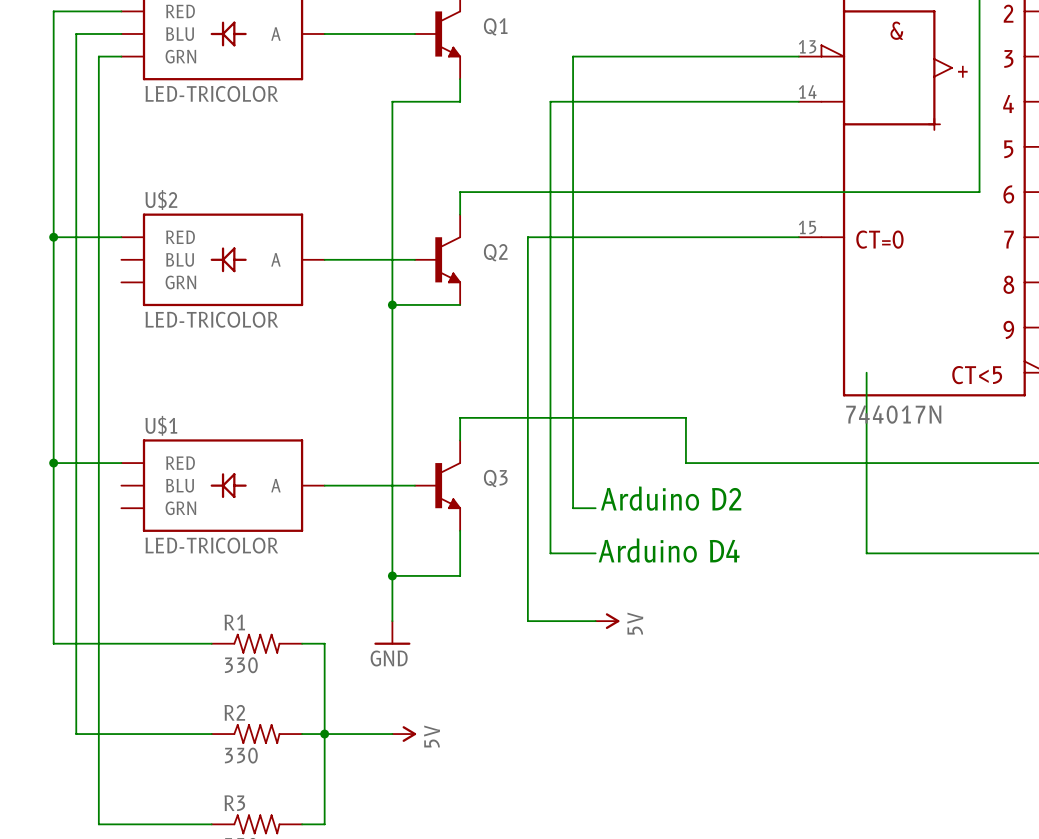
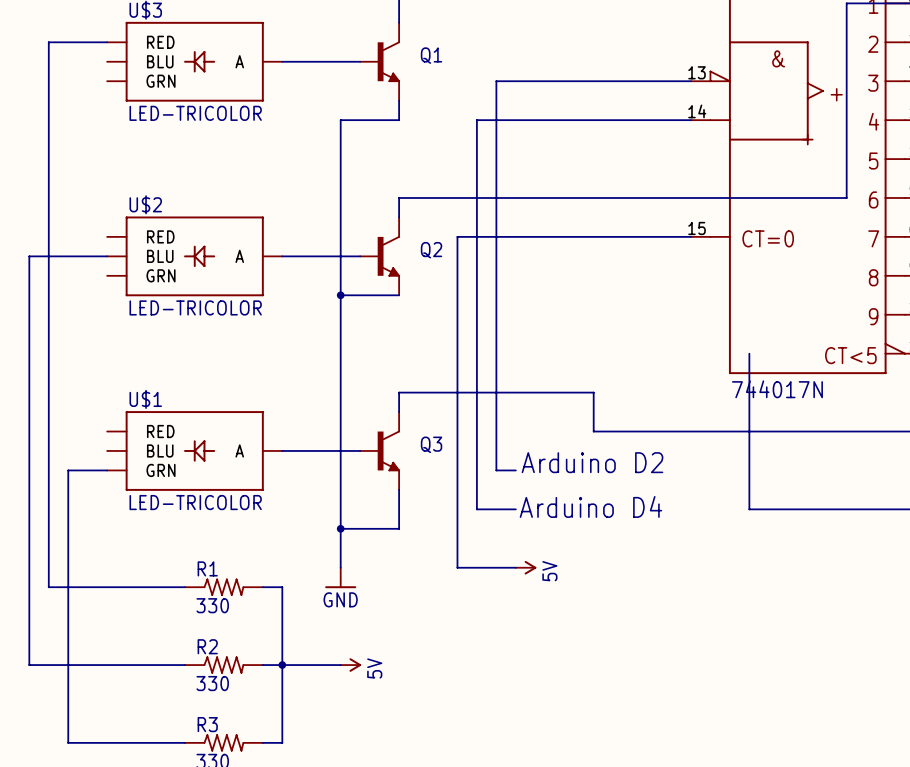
wire: (121, 33) (76, 33) (76, 508) -> (107, 470) (68, 470)
wire: (121, 56) (98, 56) (98, 824) -> (107, 256) (29, 256) (29, 665) (68, 665) (68, 742) (87, 742)
wire: (53, 237) (121, 237) -> none
junction: (53, 237) -> none
wire: (53, 463) (121, 463) -> none
junction: (53, 463) -> none

